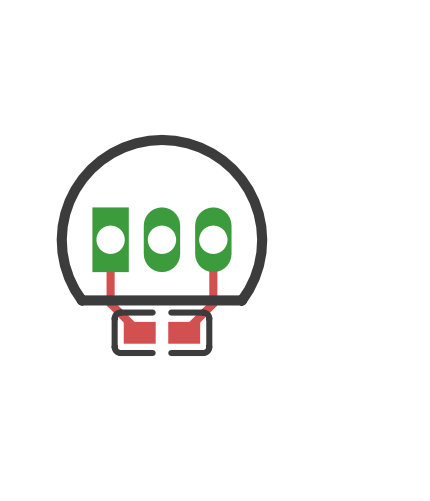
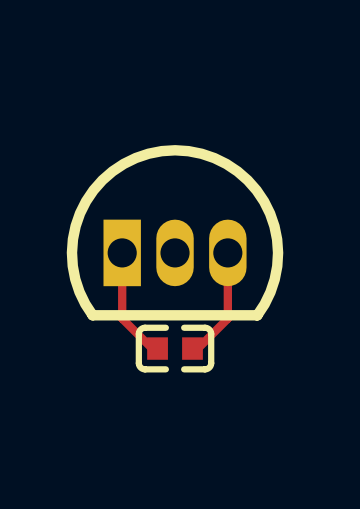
part footprint: [111, 309, 213, 357] -> [135, 324, 215, 373]

